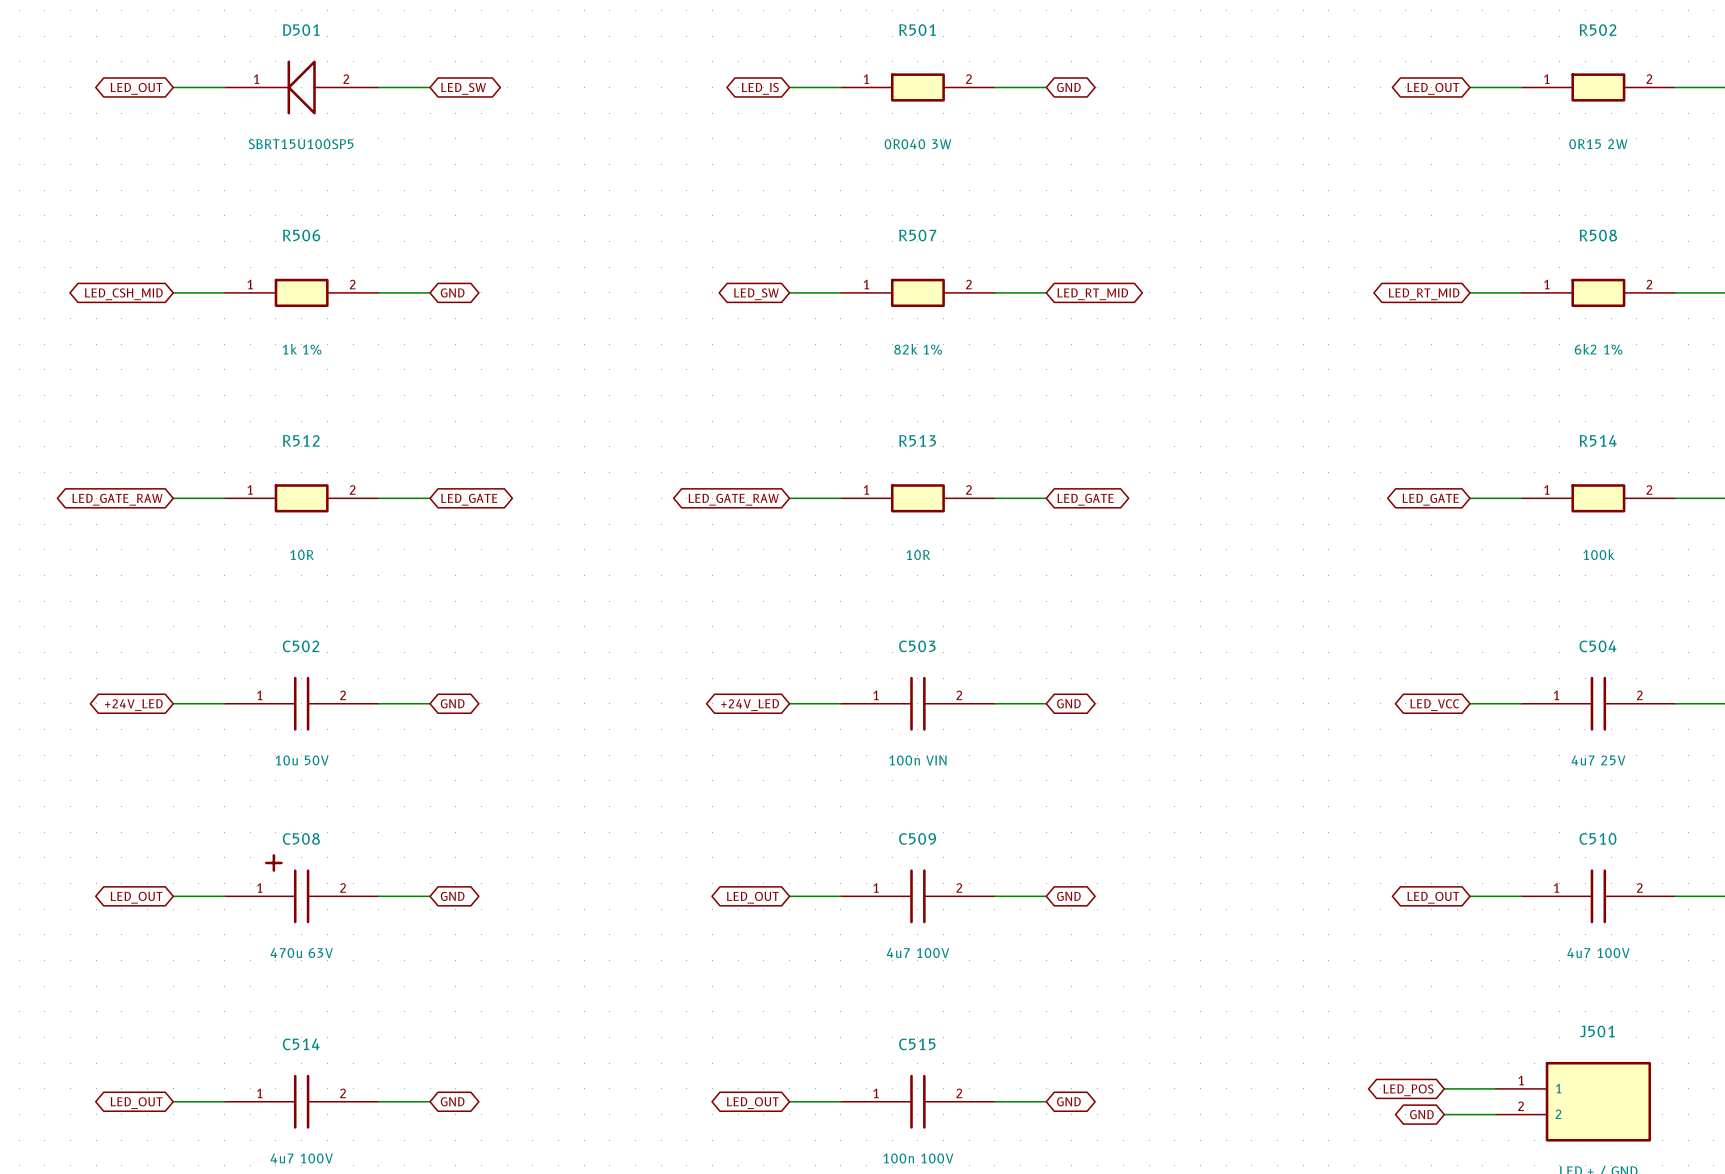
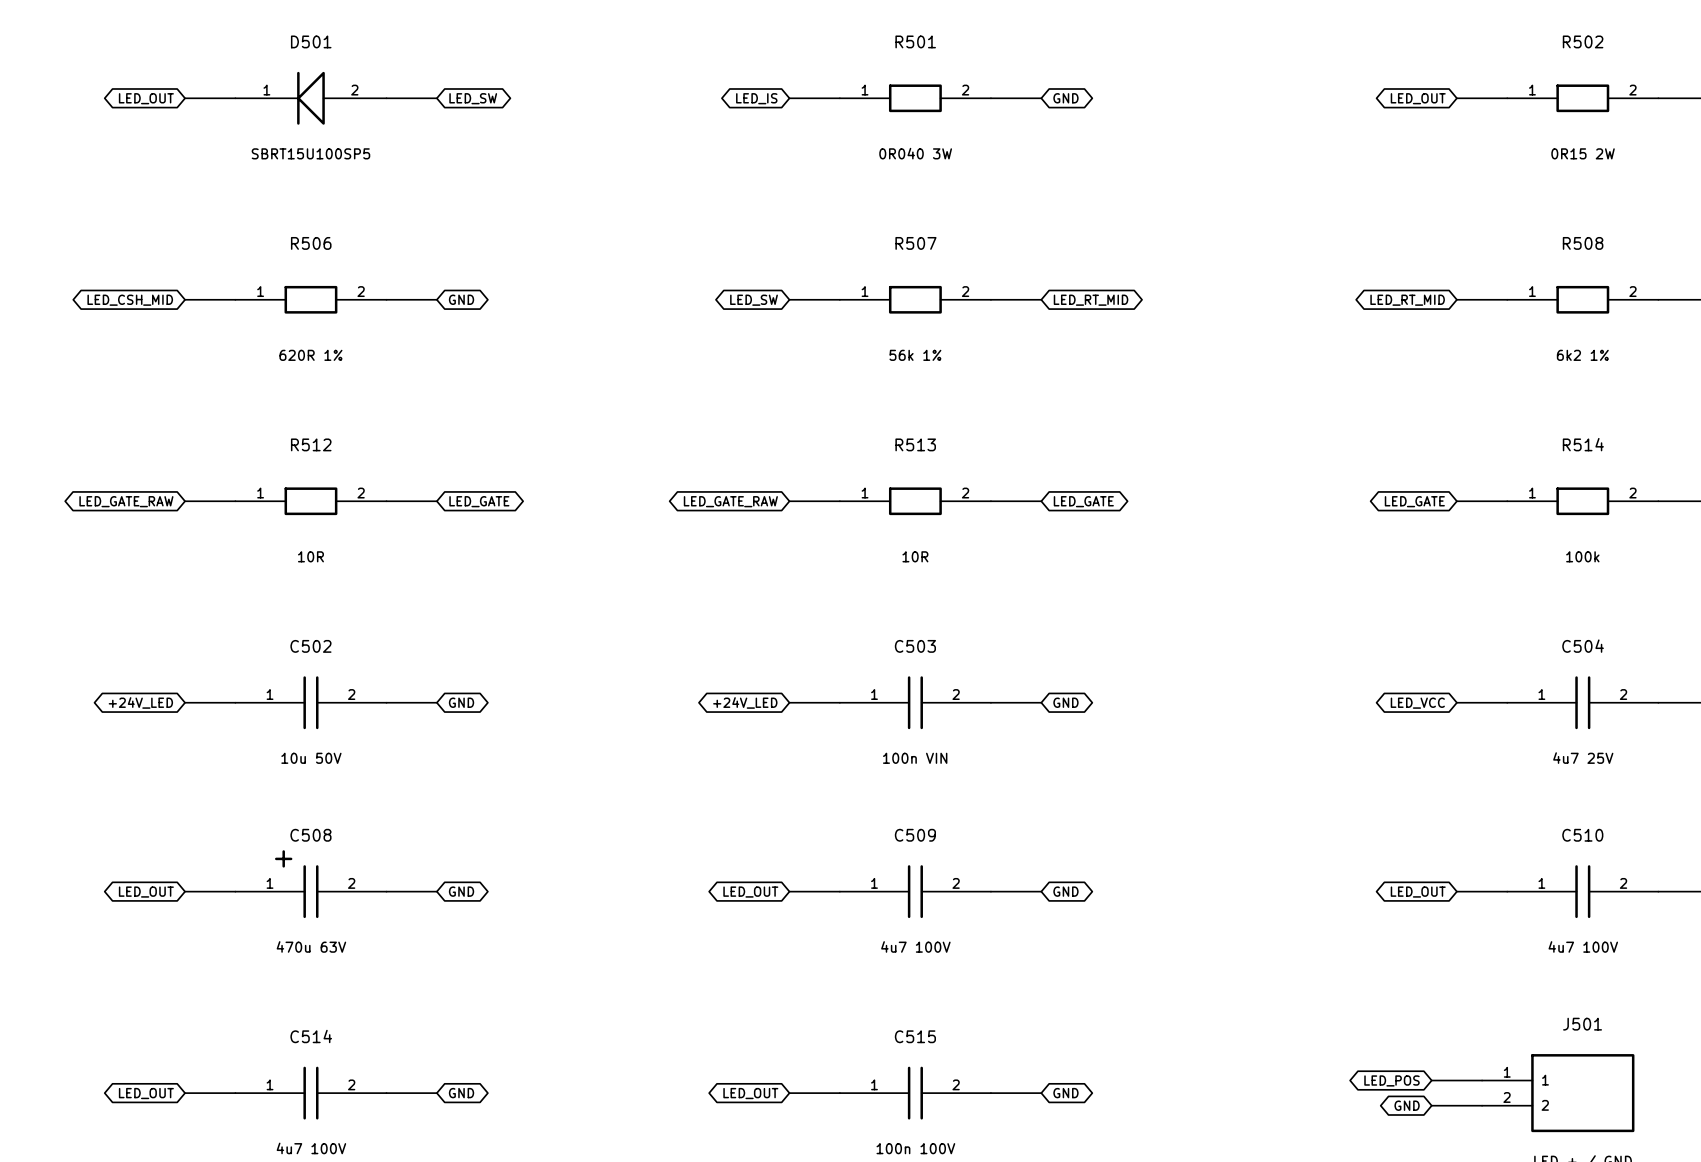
R506 value: 1k 1% (302, 349) -> 620R 1% (310, 355)
R507 value: 82k 1% (918, 349) -> 56k 1% (915, 355)

